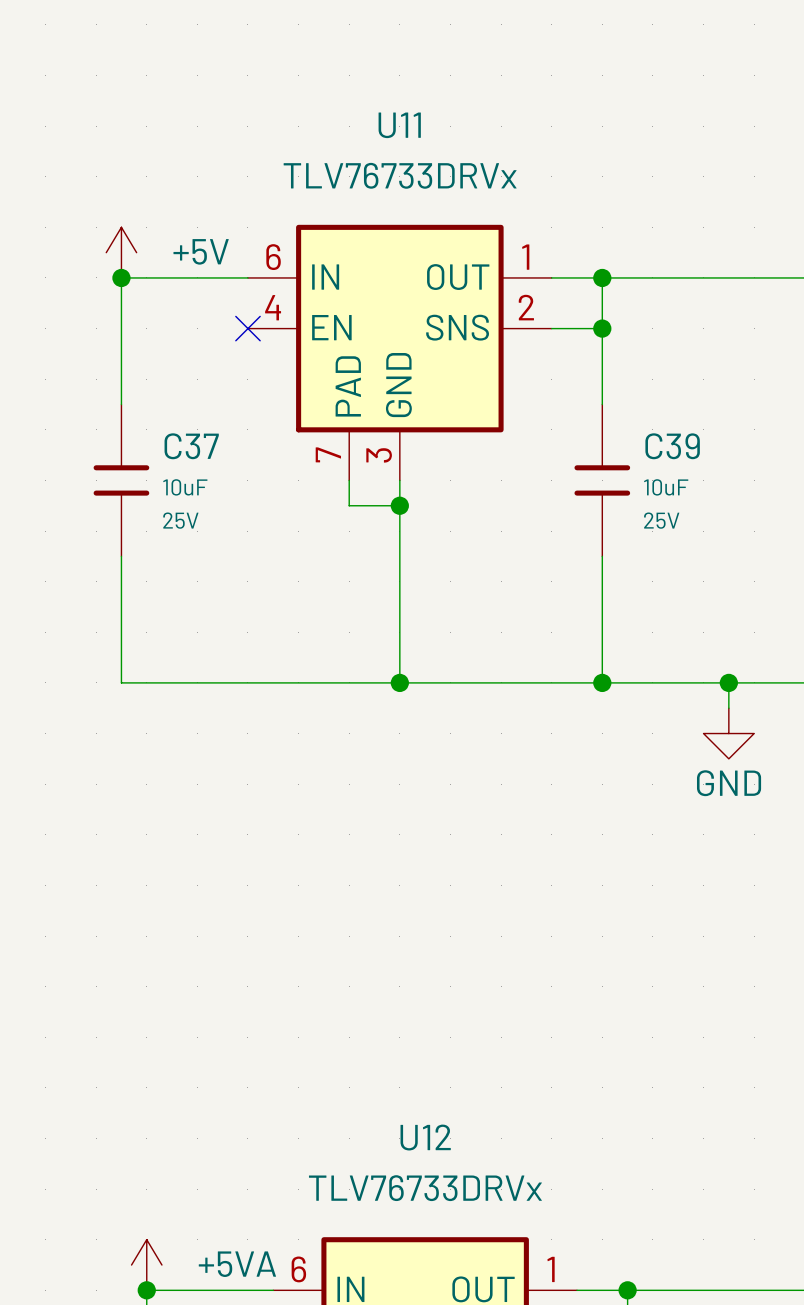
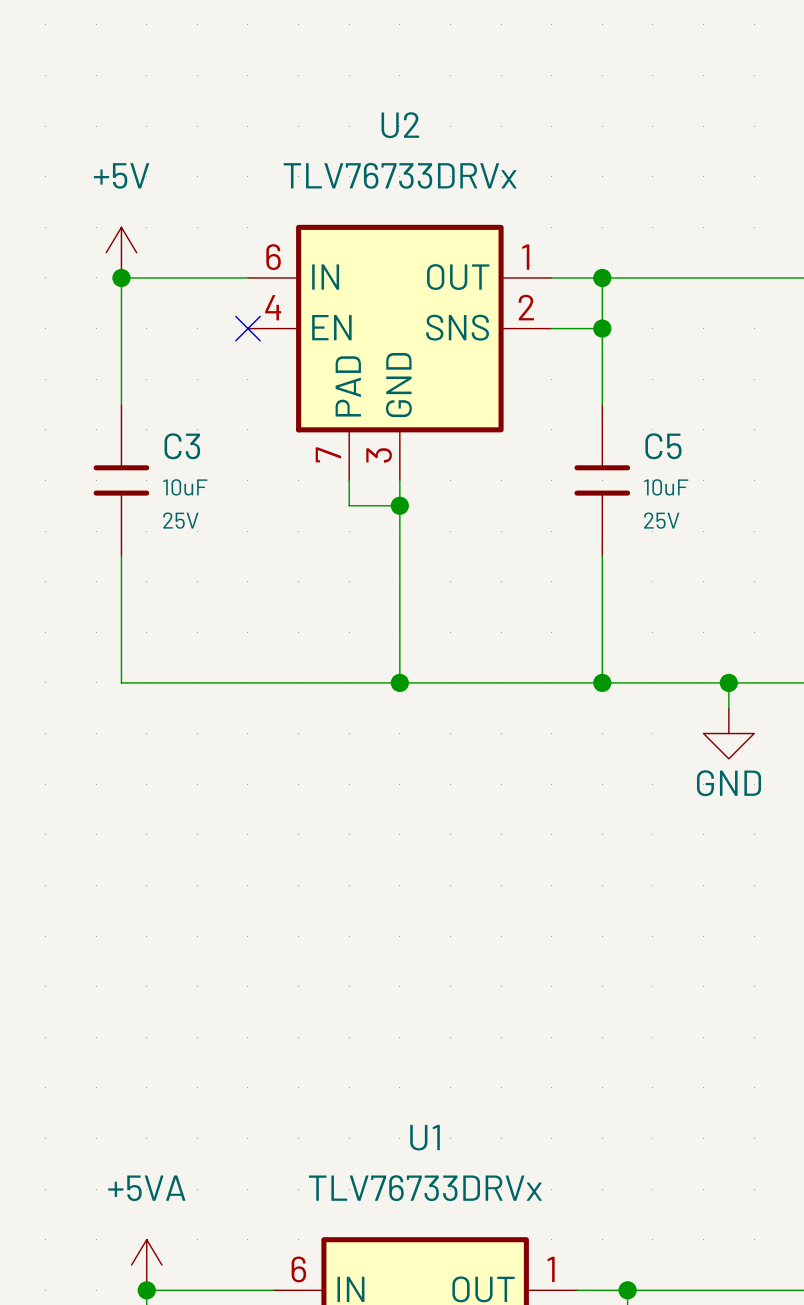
U11 name: U11 (399, 125) -> U2 (400, 125)
power symbol text position: +5V (201, 251) -> +5V (121, 175)
C37 name: C37 (191, 446) -> C3 (182, 446)
C39 name: C39 (672, 446) -> C5 (663, 446)
U12 name: U12 (425, 1137) -> U1 (425, 1137)
power symbol text position: +5VA (237, 1264) -> +5VA (146, 1188)

